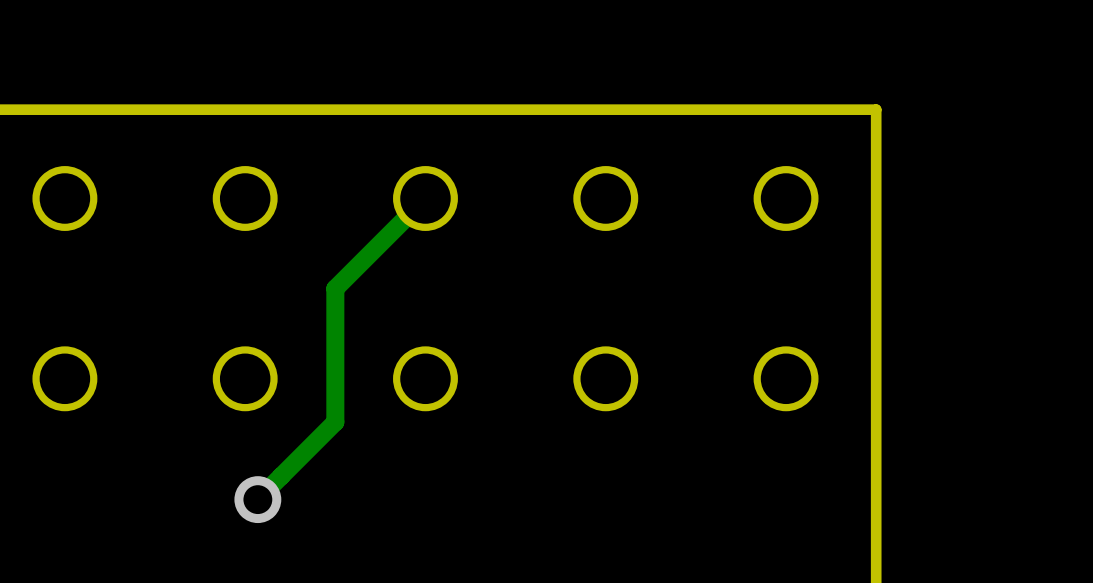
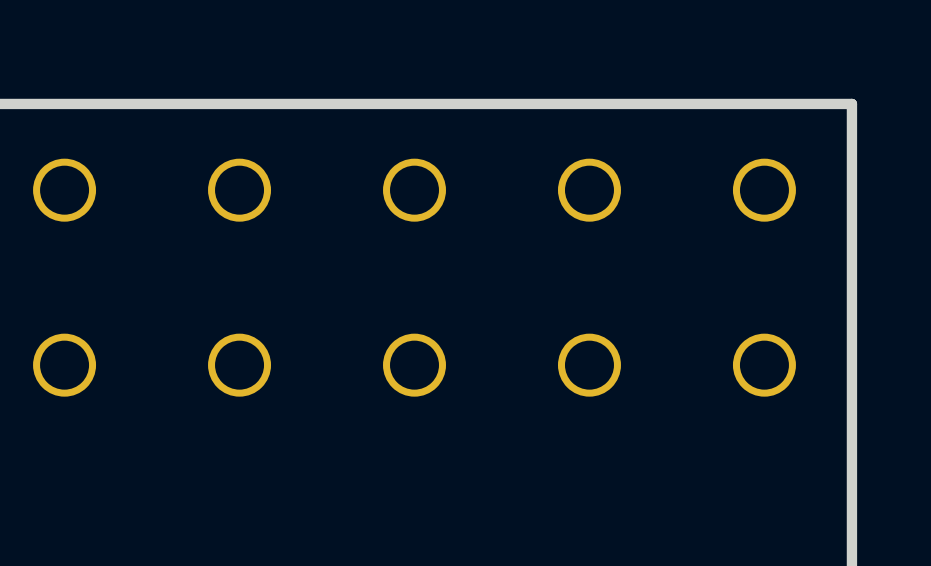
track: (425, 198) (335, 288) (335, 422) (257, 499) -> none
via: (257, 499) -> none

